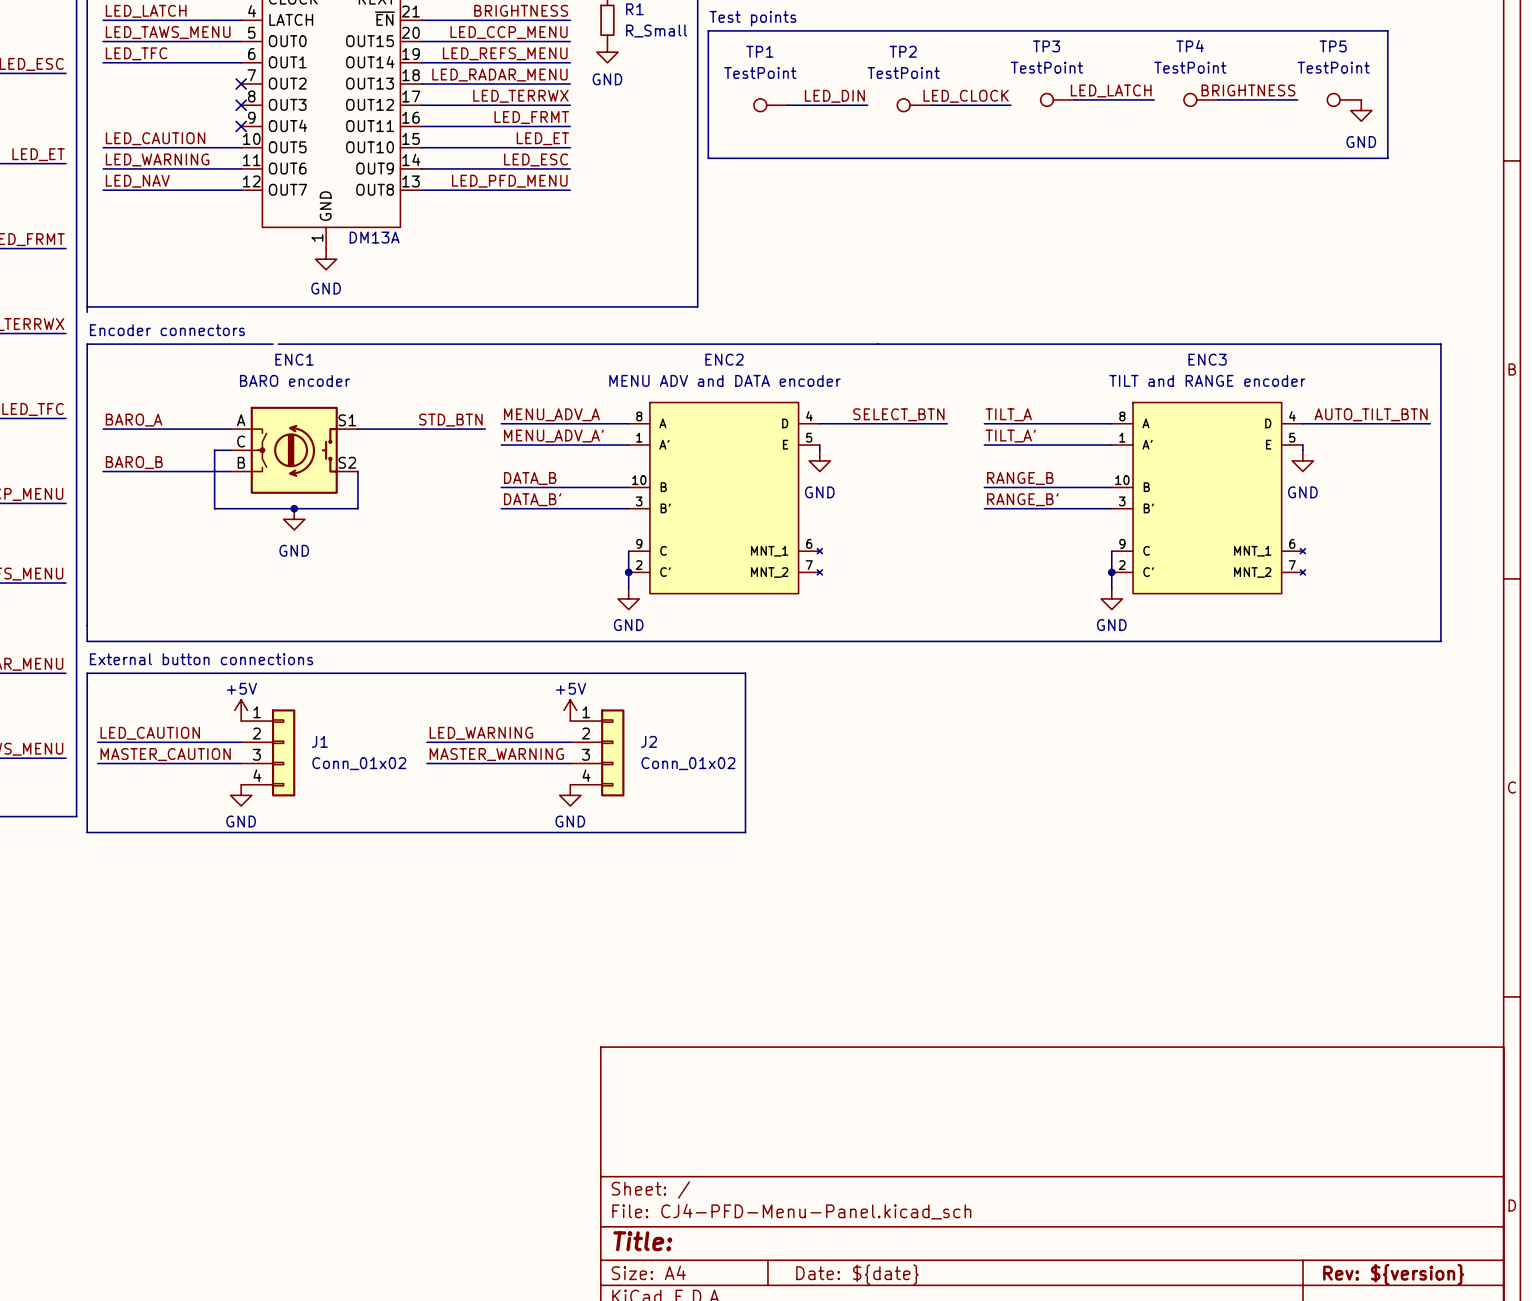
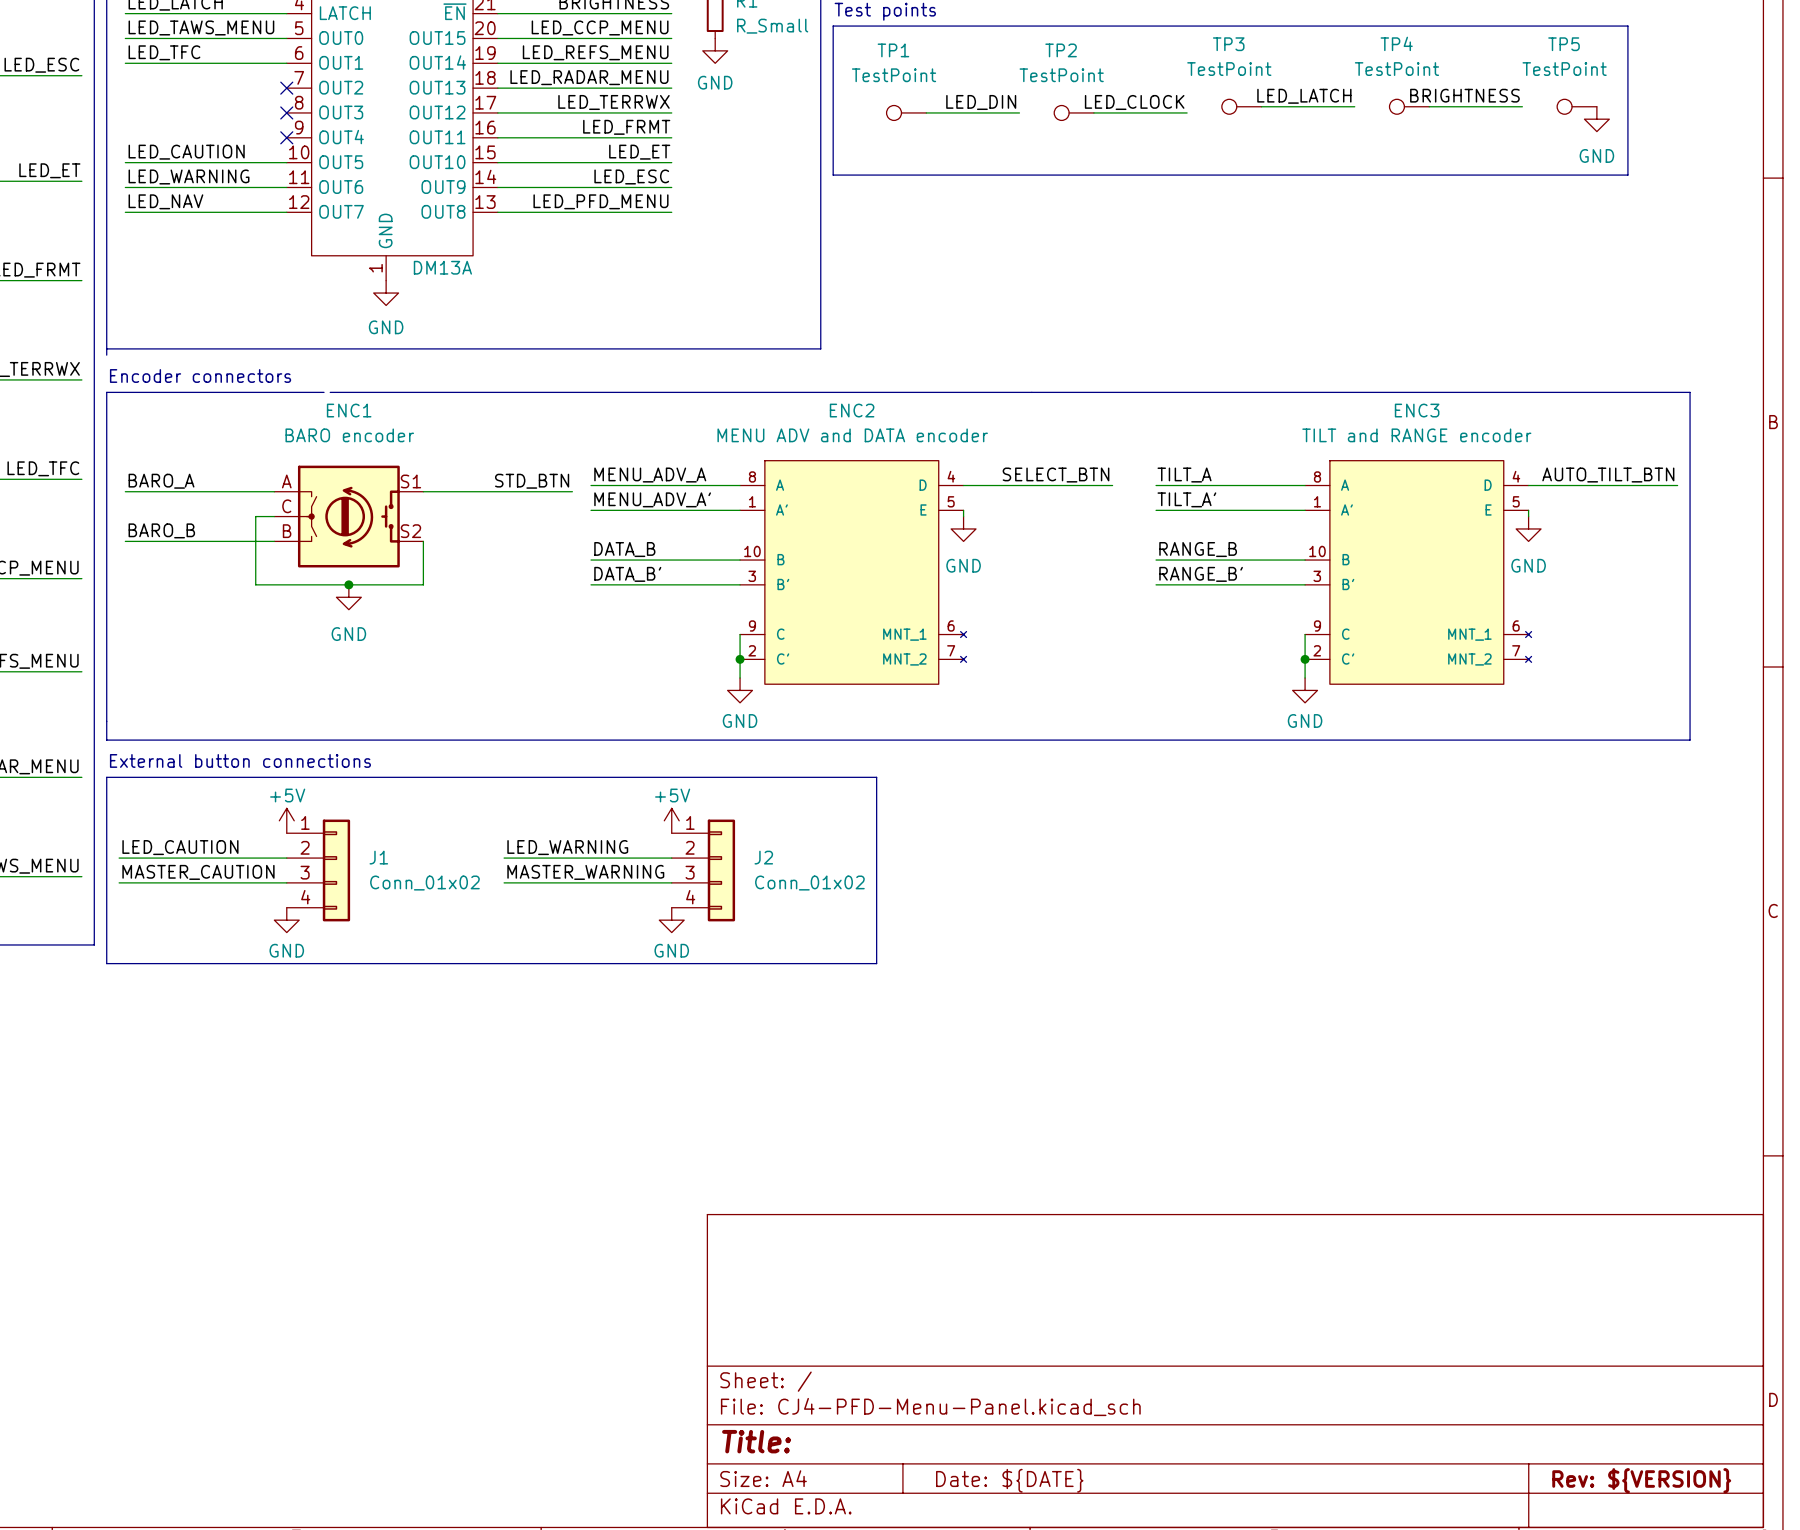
title block: Date: ${date} (857, 1274) -> Date: ${DATE} (1009, 1480)
title block: Rev: ${version} (1393, 1274) -> Rev: ${VERSION} (1641, 1480)

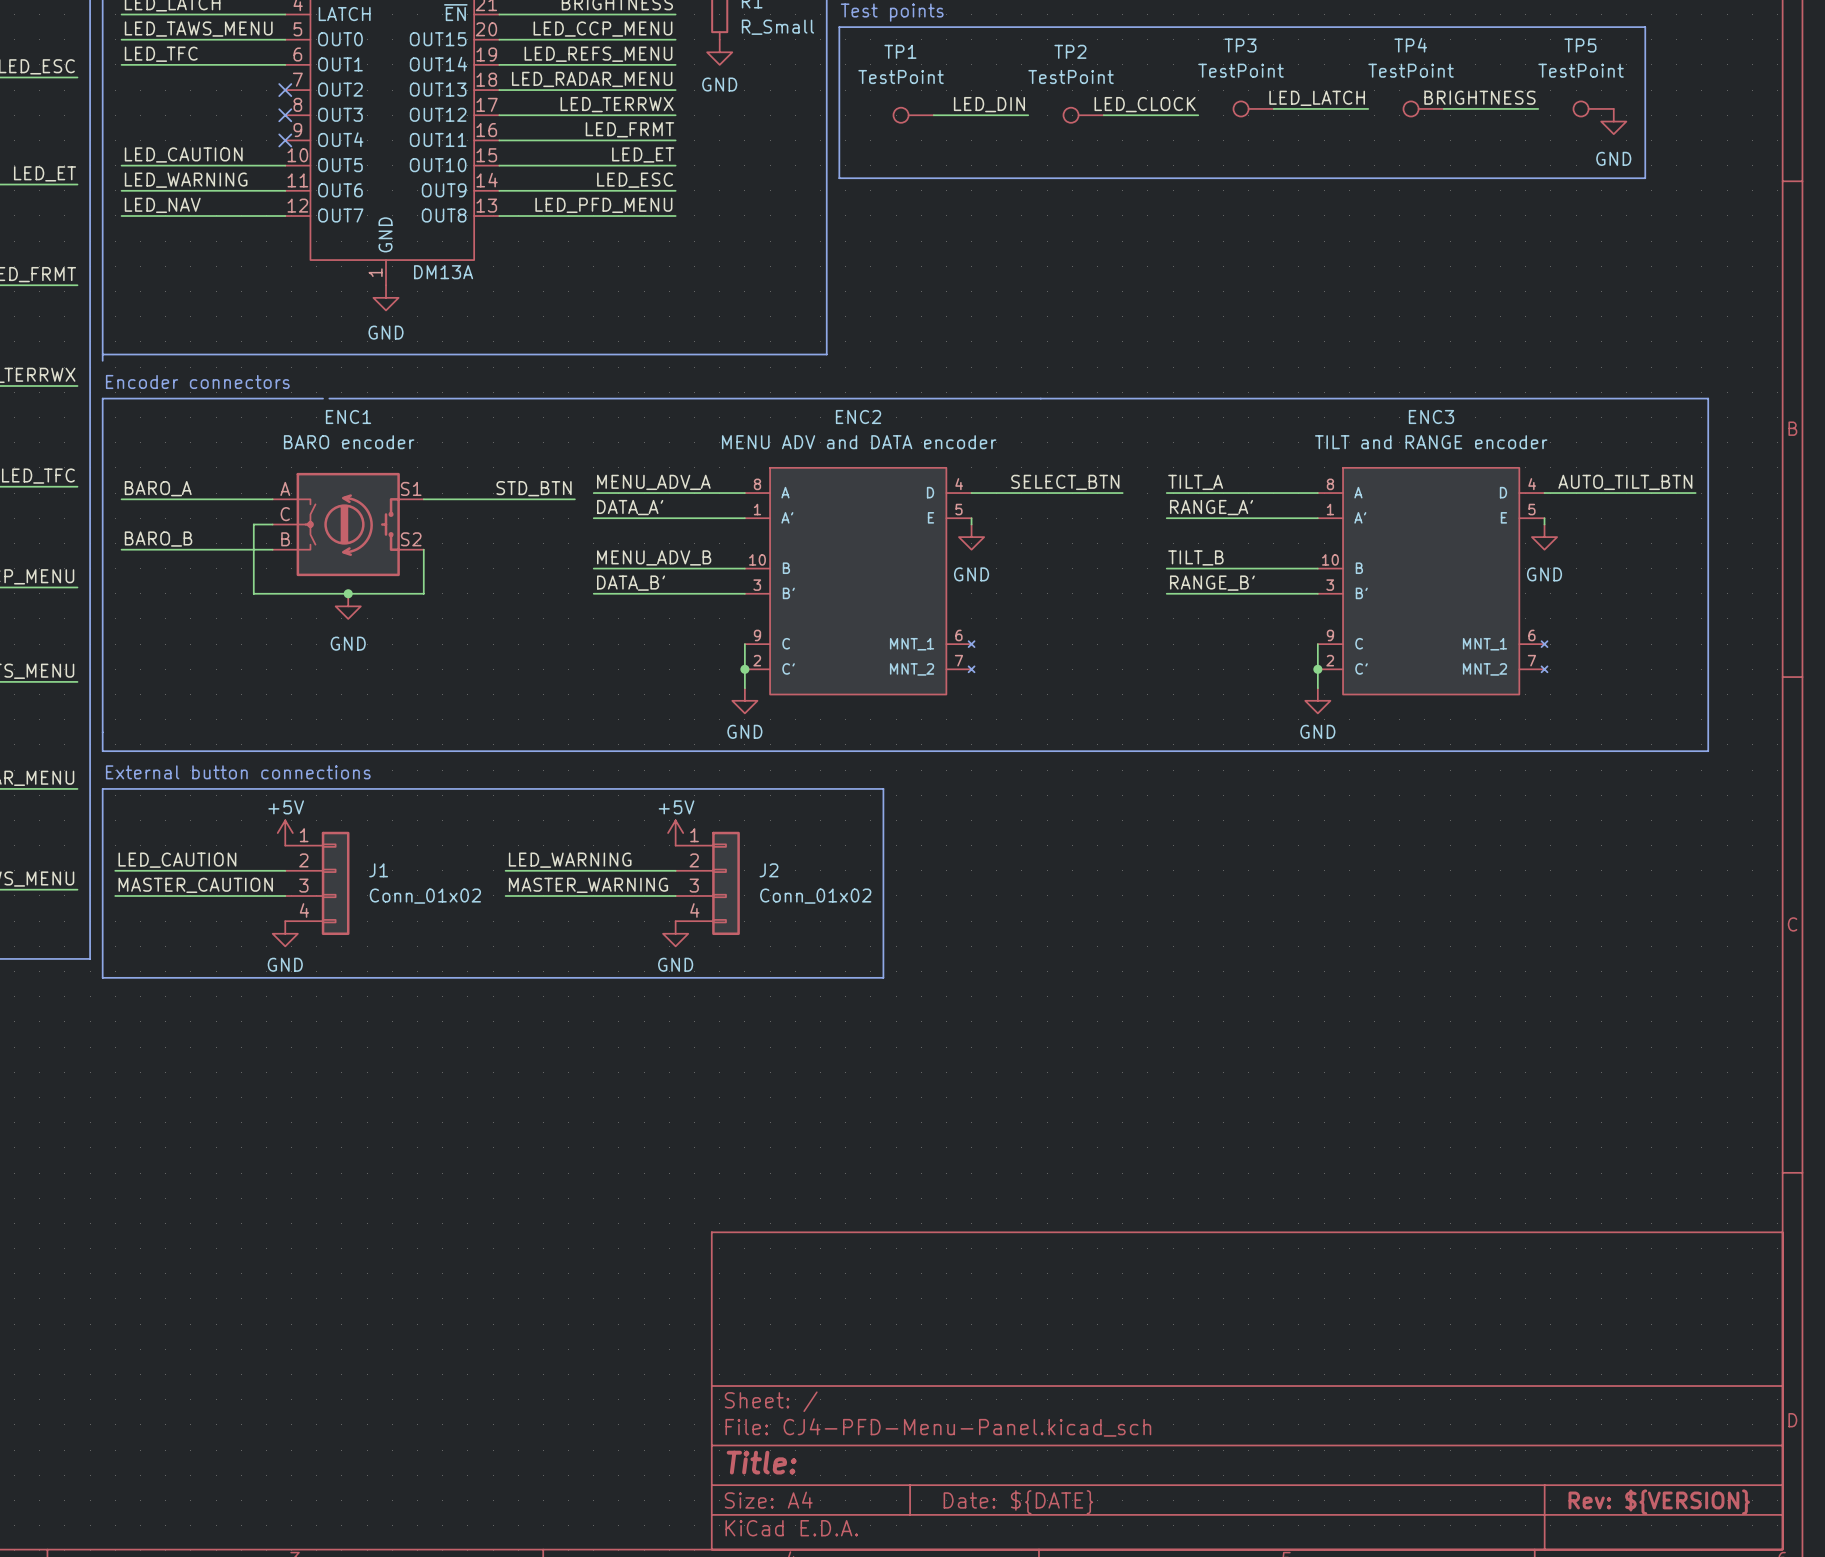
label: MENU_ADV_A' (652, 499) -> DATA_A' (630, 507)
label: TILT_A' (1186, 499) -> RANGE_A' (1211, 507)
label: DATA_B (624, 549) -> MENU_ADV_B (654, 557)
label: RANGE_B (1198, 549) -> TILT_B (1195, 557)

